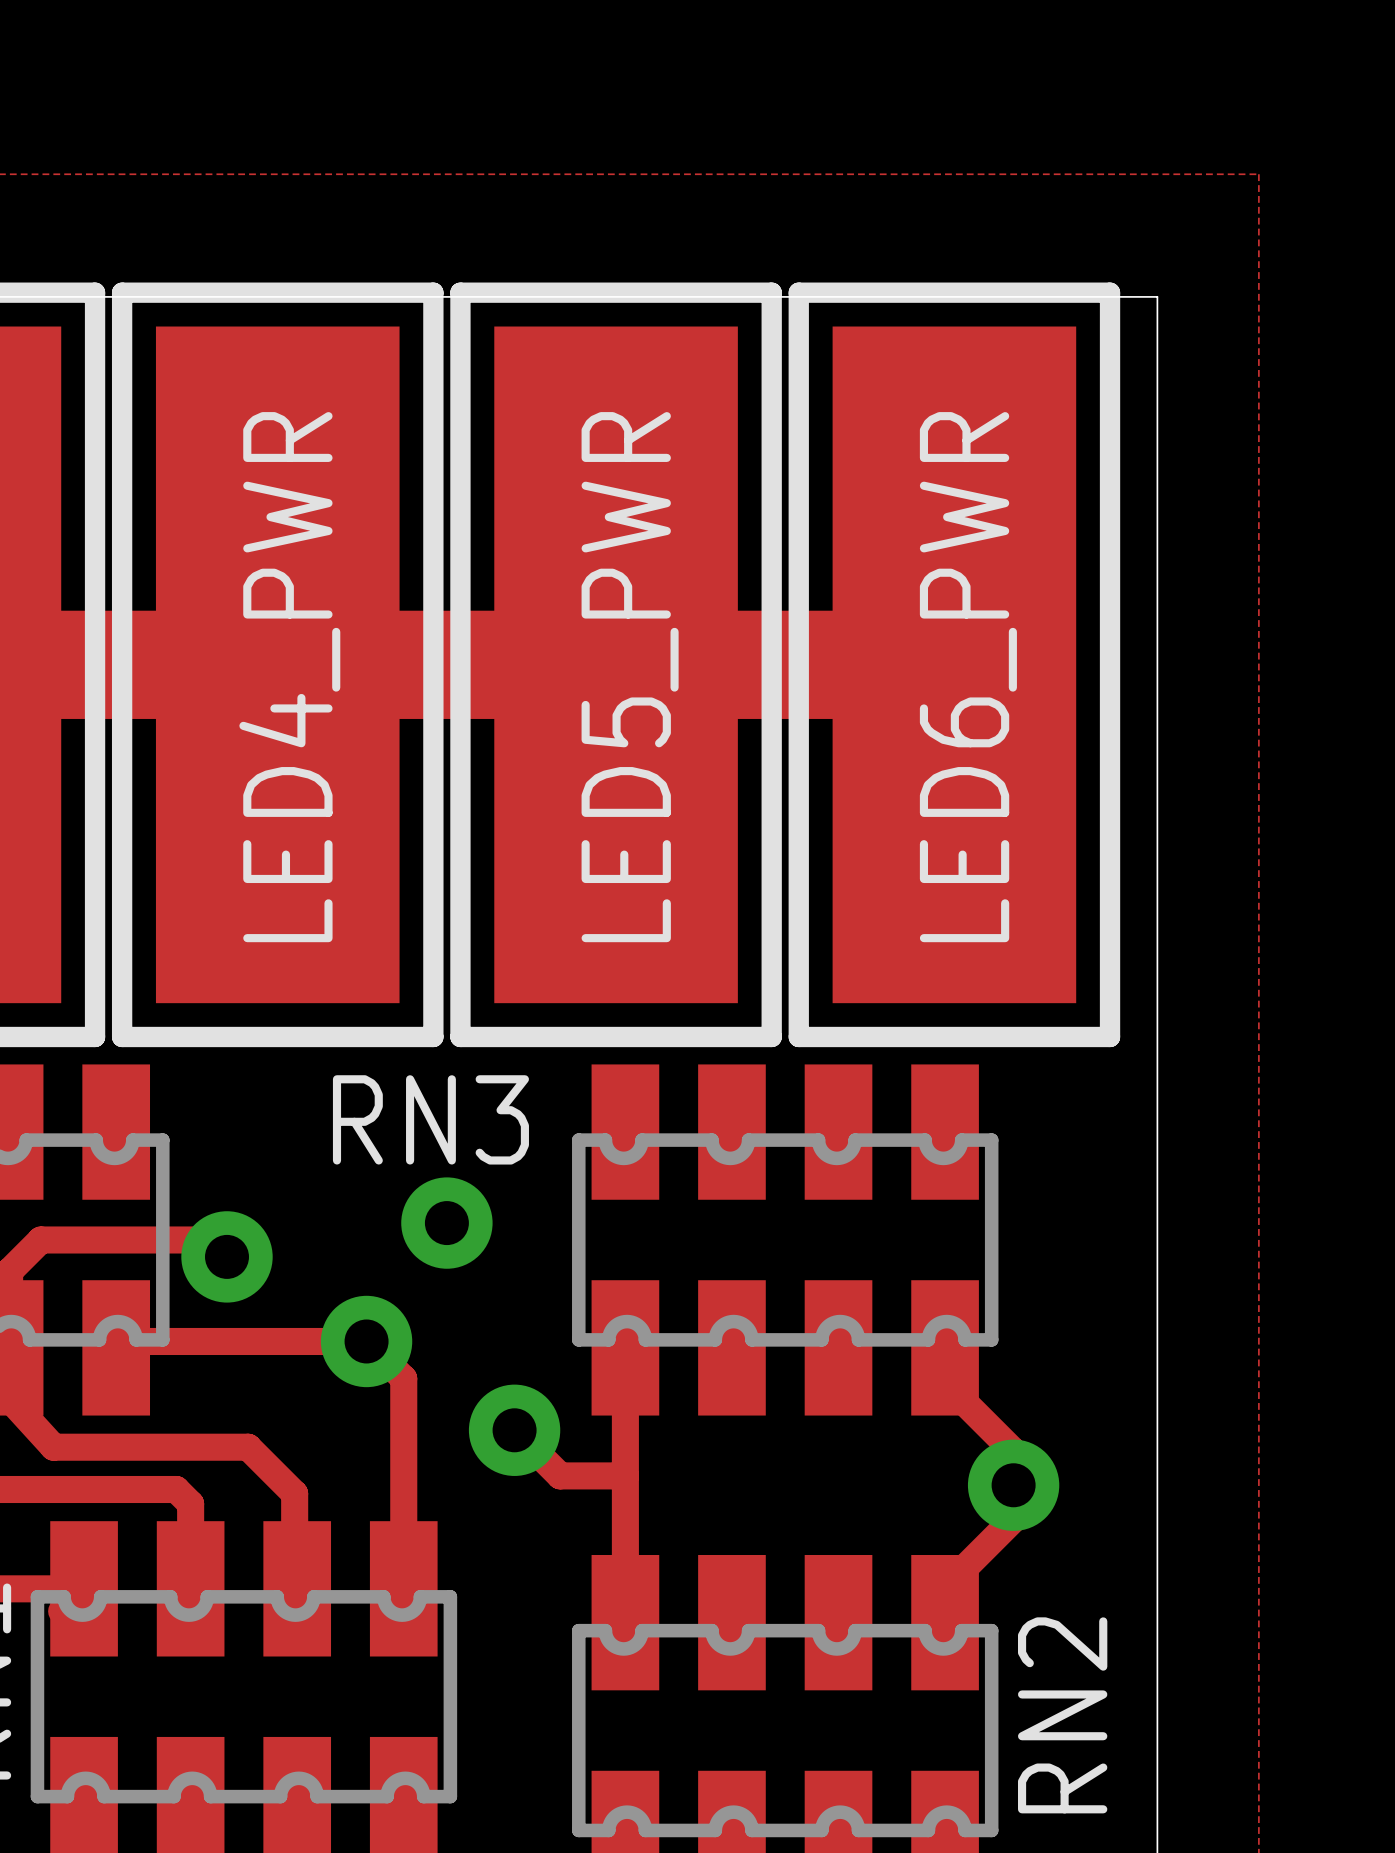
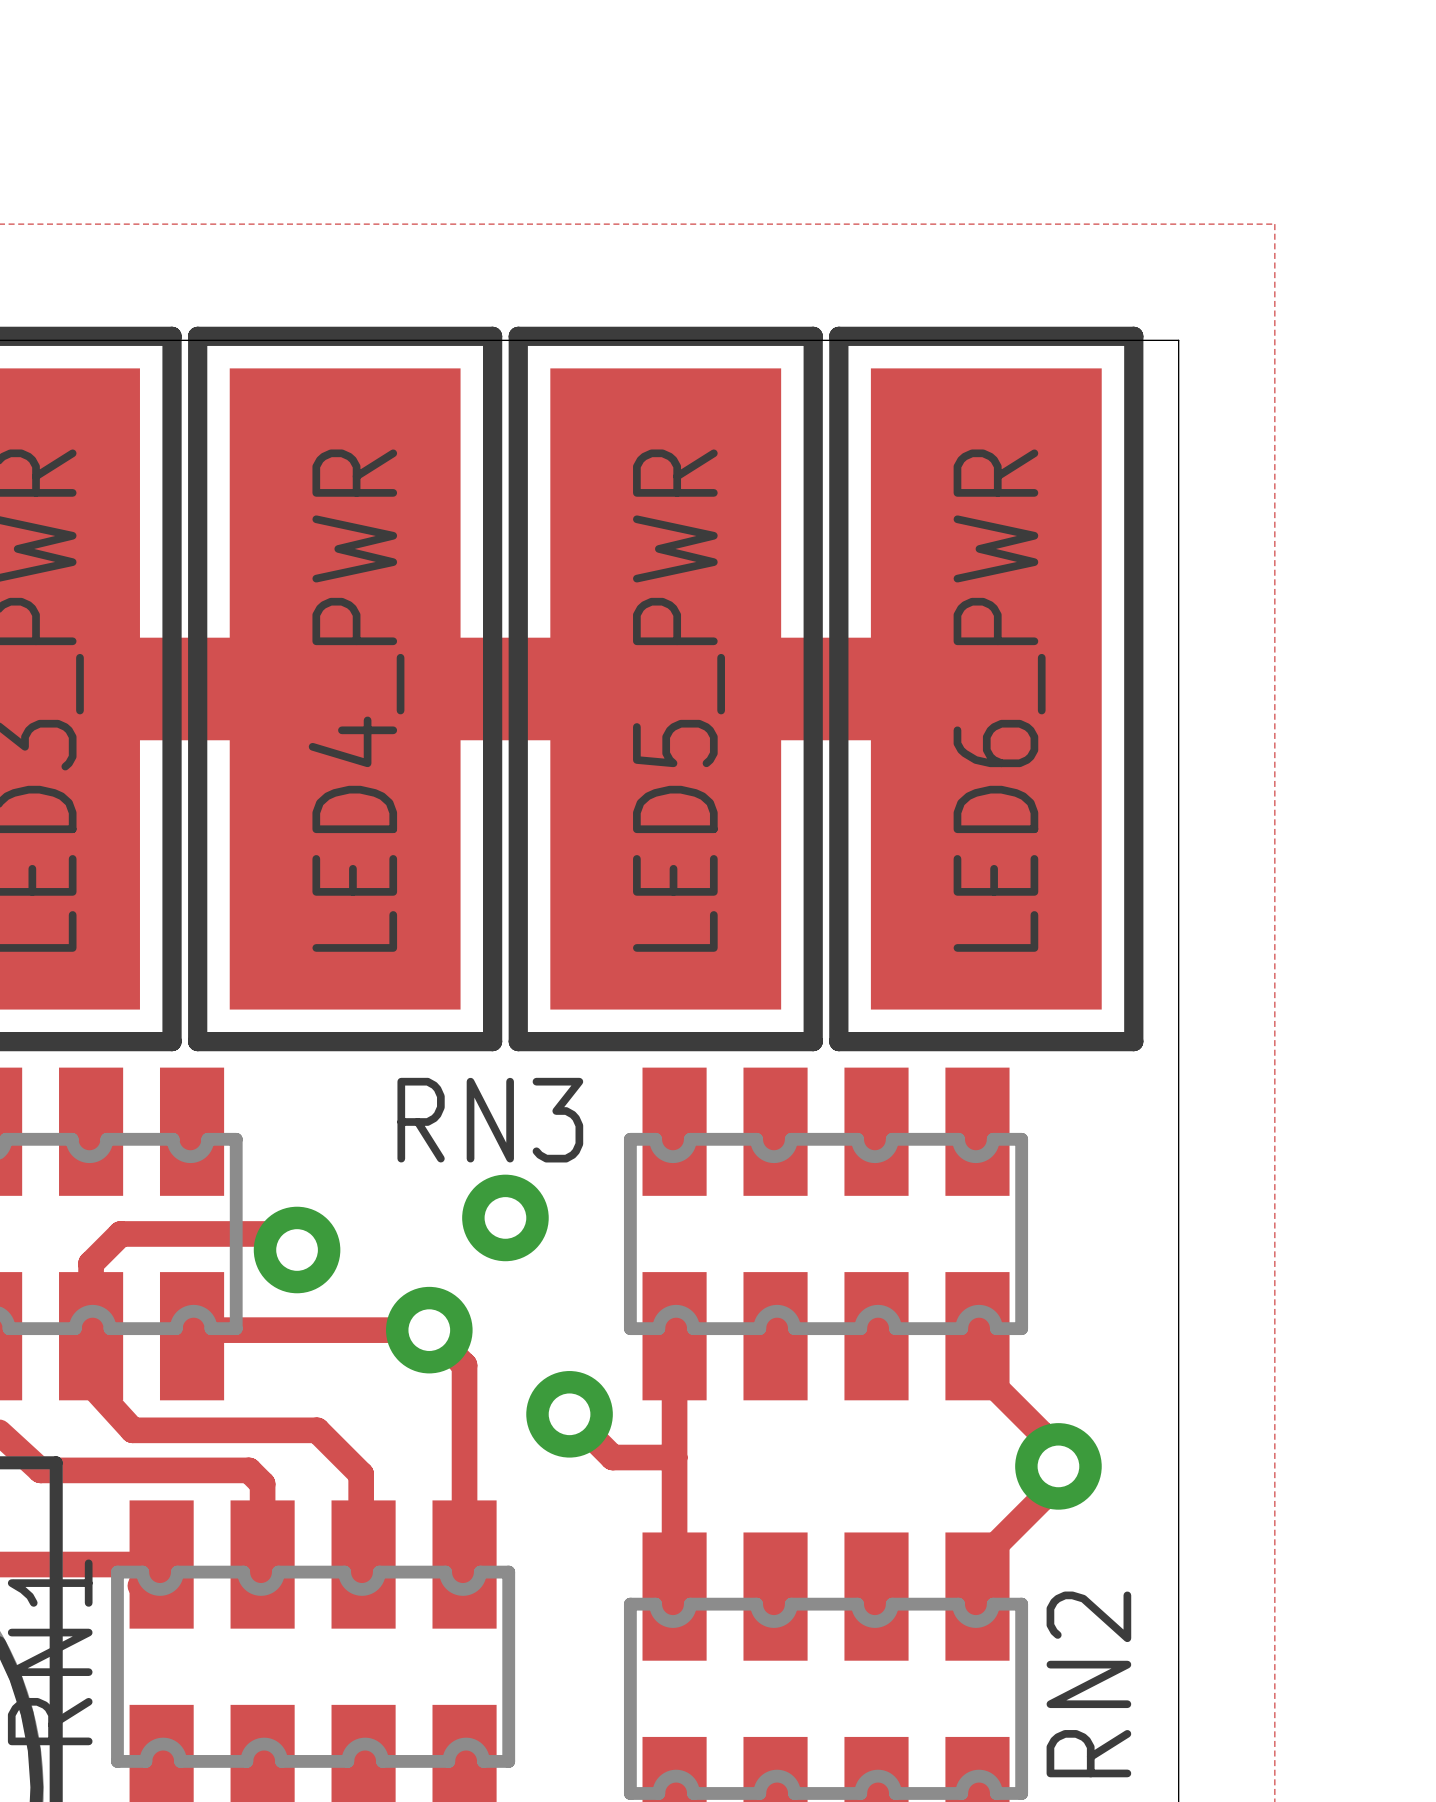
via position: (1013, 1485) -> (1058, 1466)

